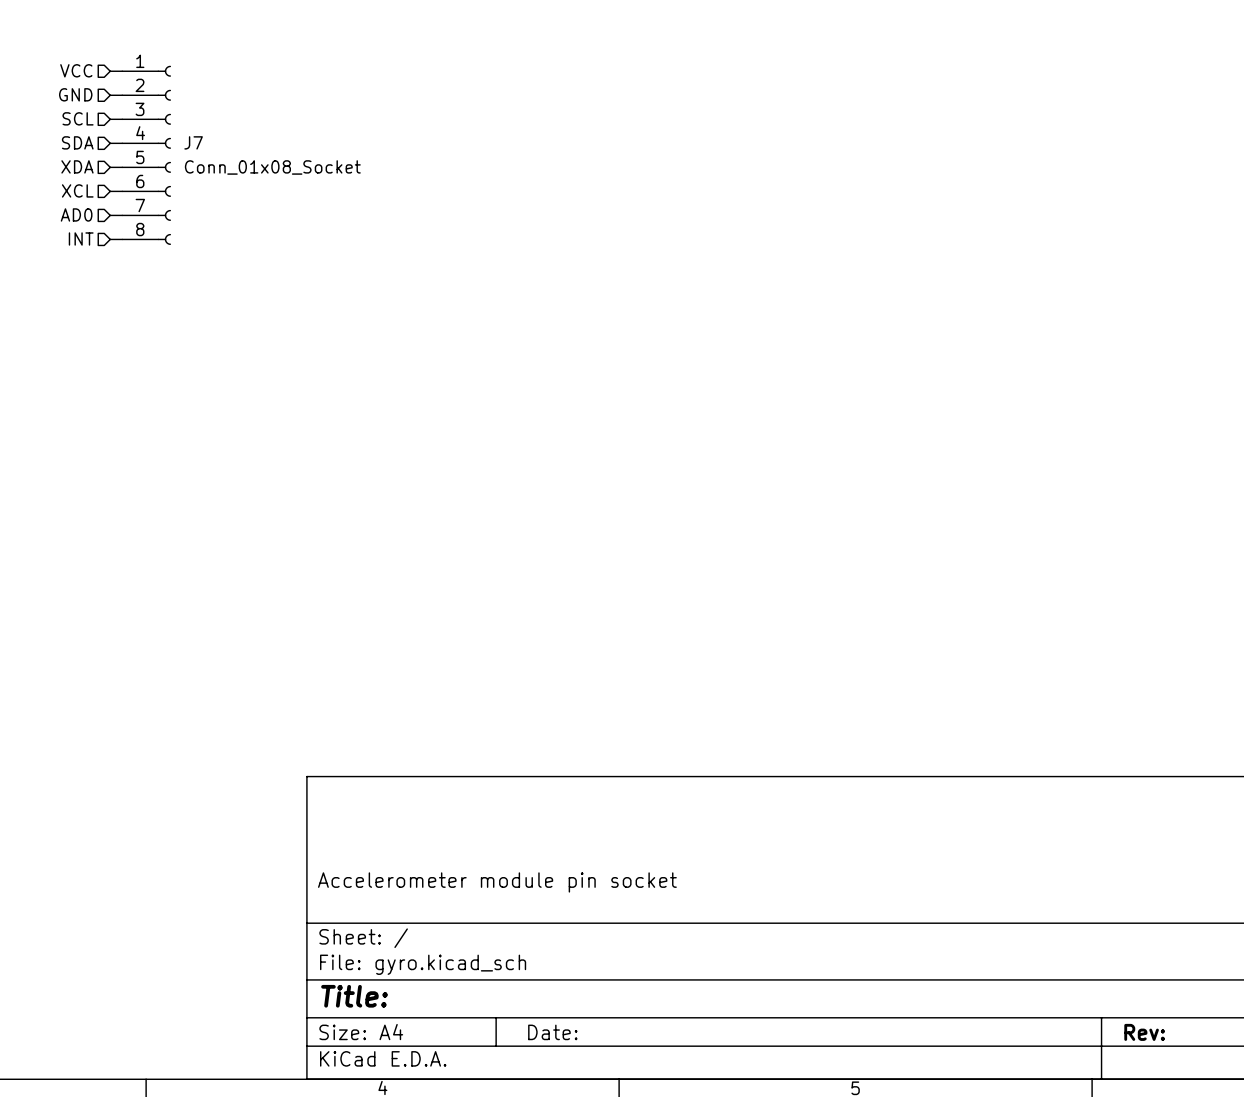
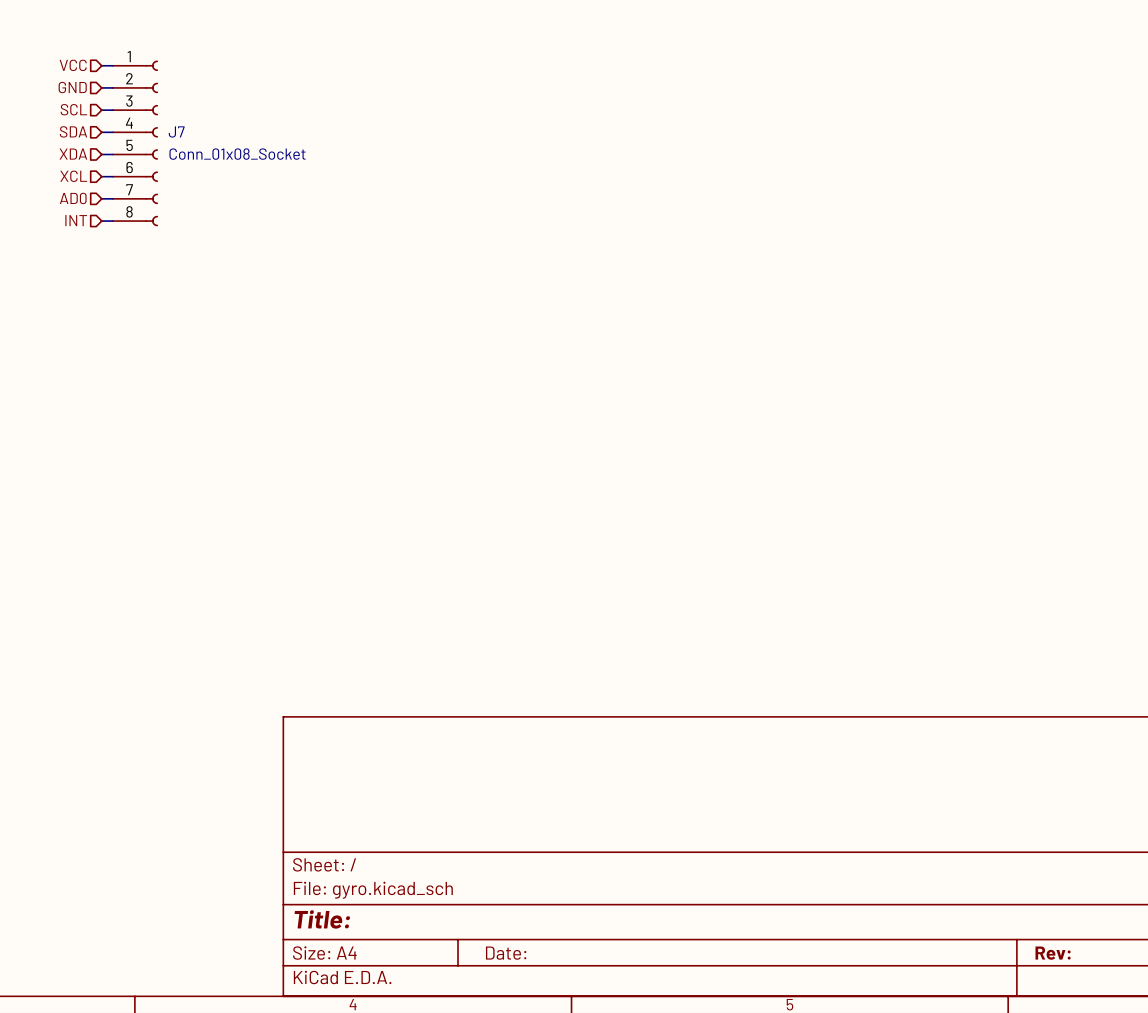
title block: Accelerometer module pin socket (497, 882) -> none

